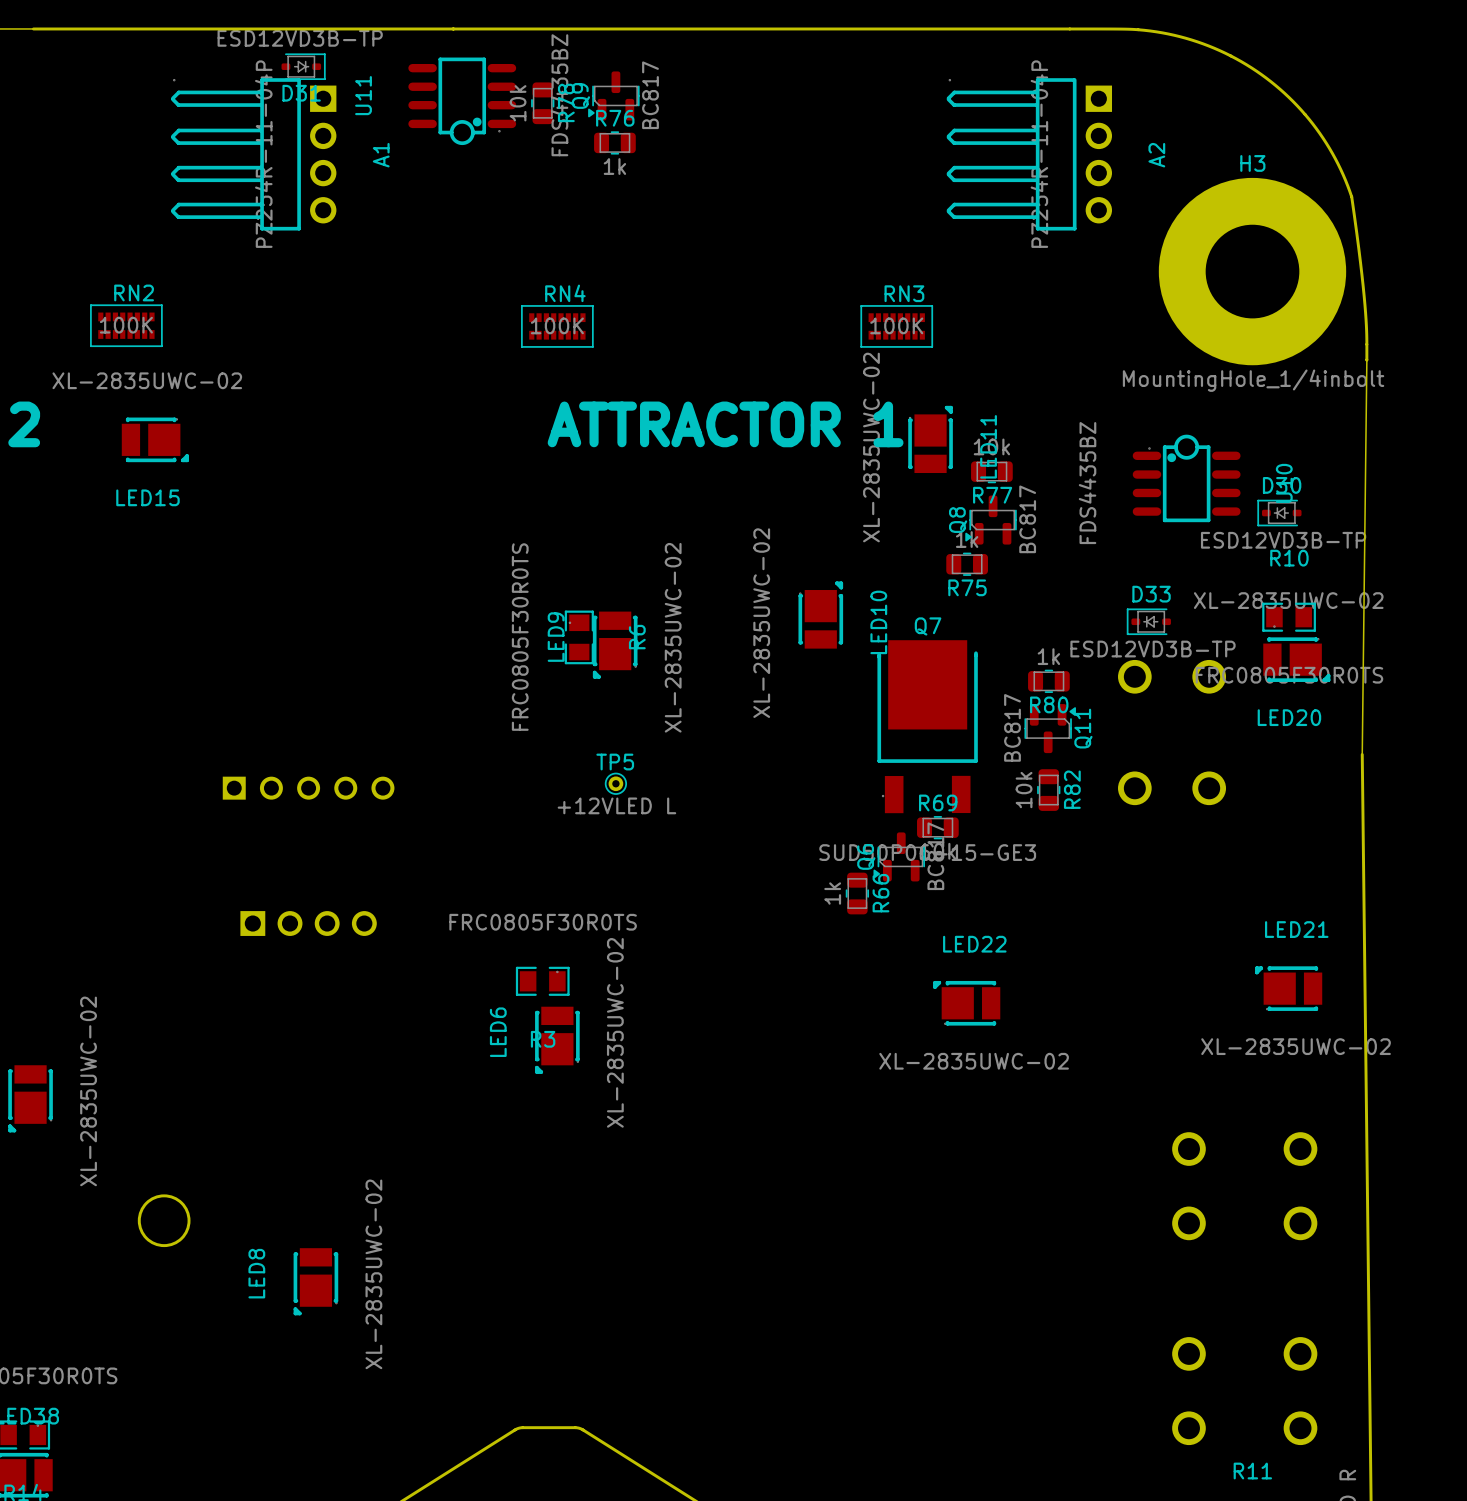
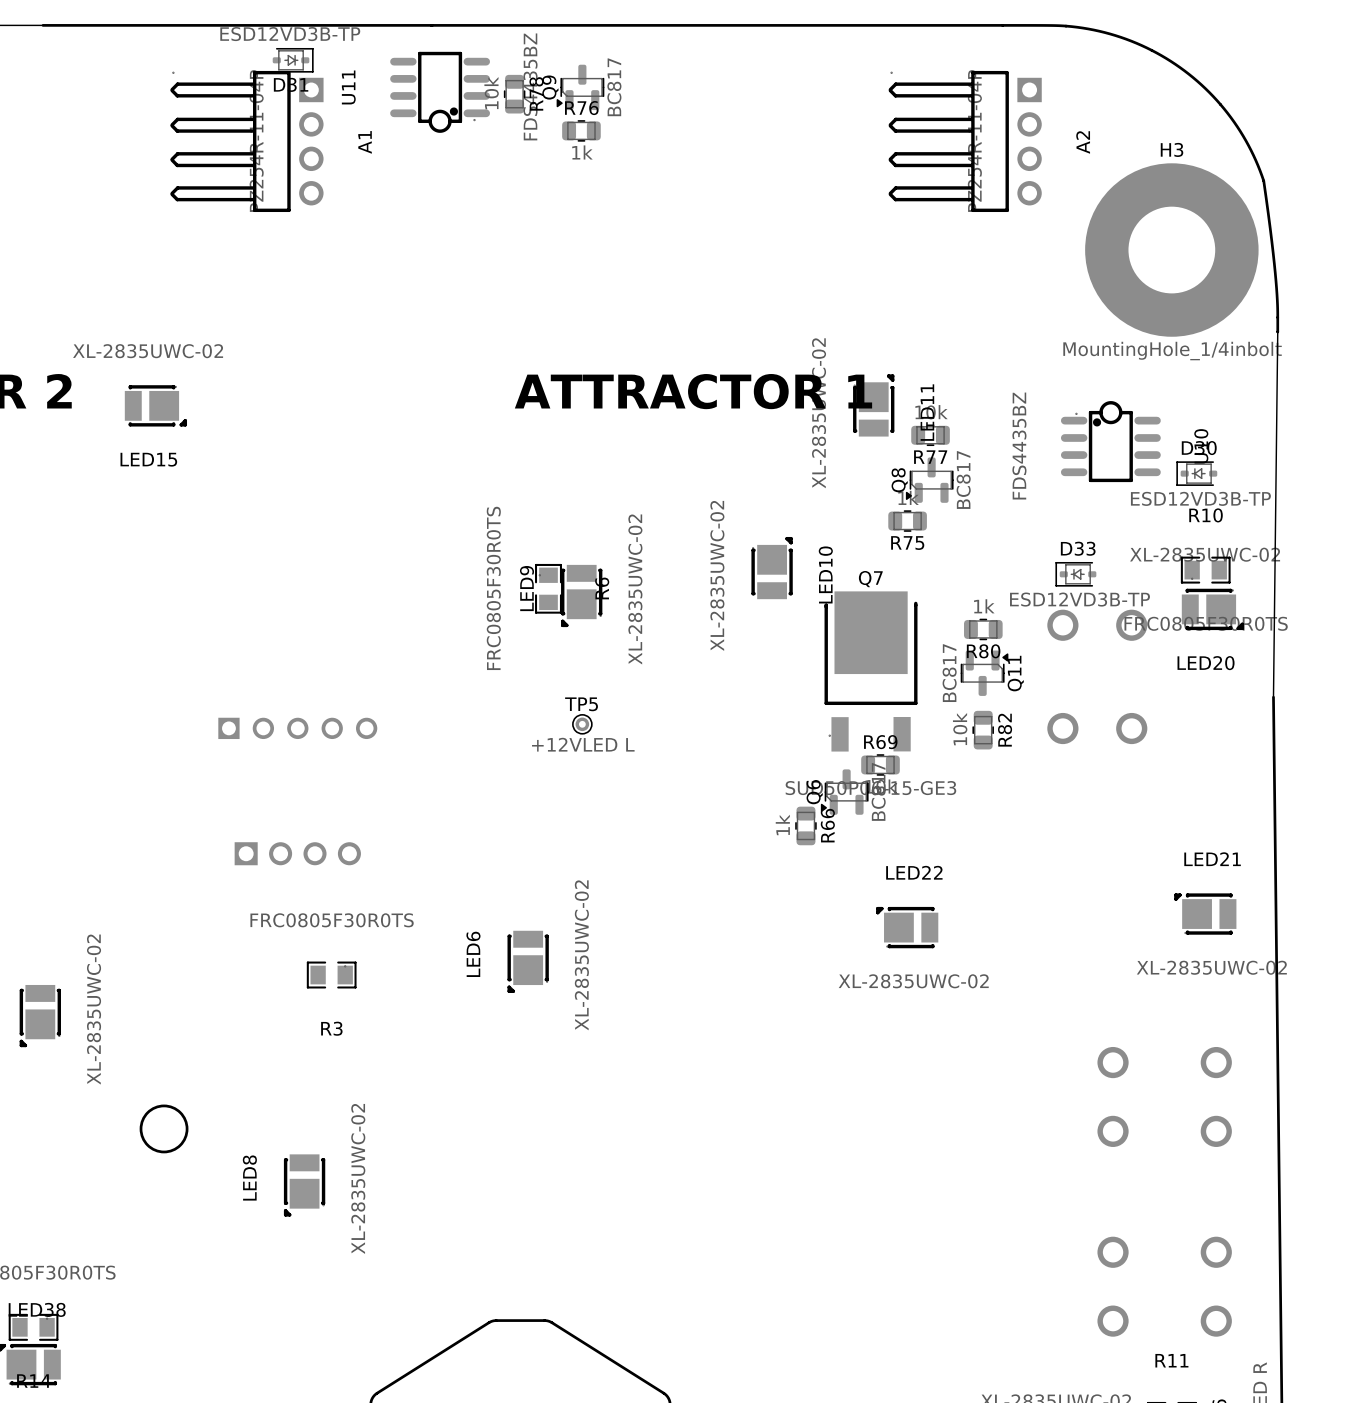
RN2: 100K (126, 325) -> none
RN4: 100K (557, 326) -> none
RN3: 100K (896, 326) -> none
R3 position: (542, 981) -> (331, 975)

